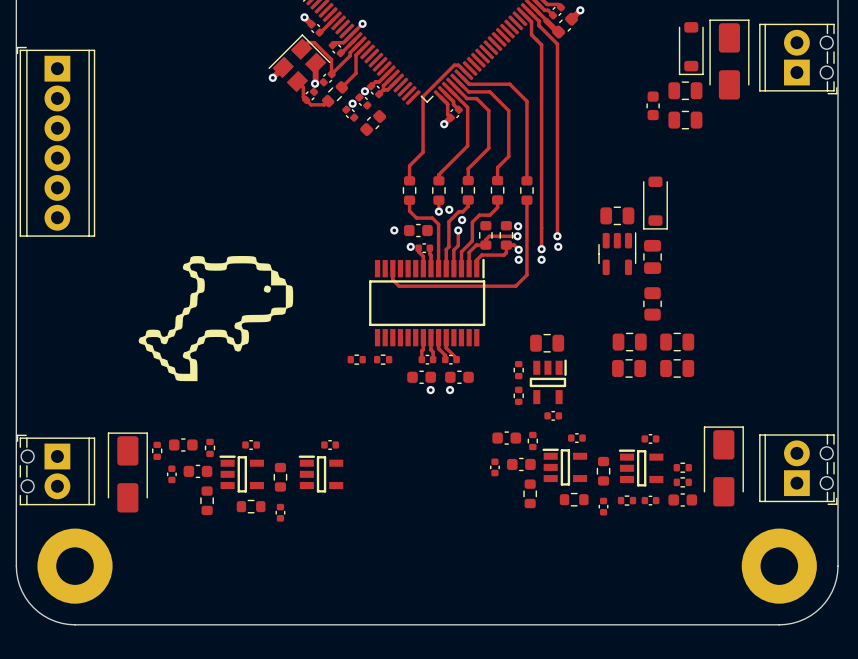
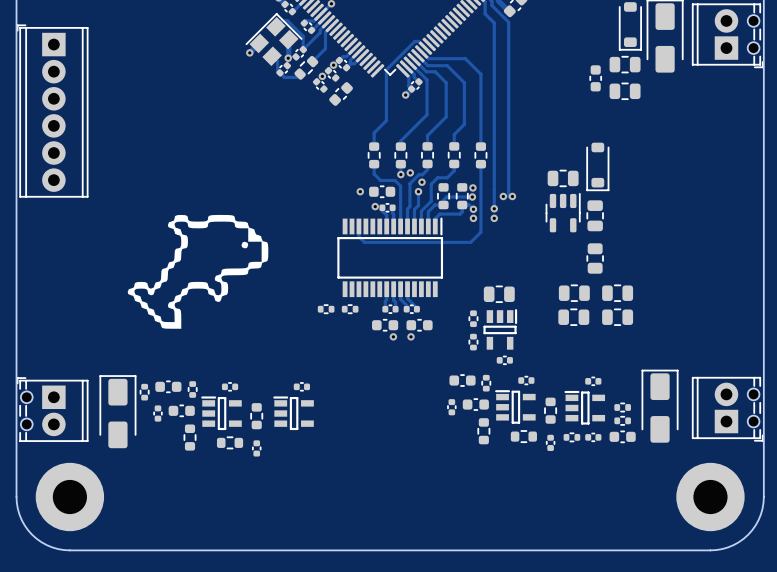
via: none -> (503, 196)
via: none -> (512, 196)
via: (557, 236) -> none
via: (558, 246) -> none

